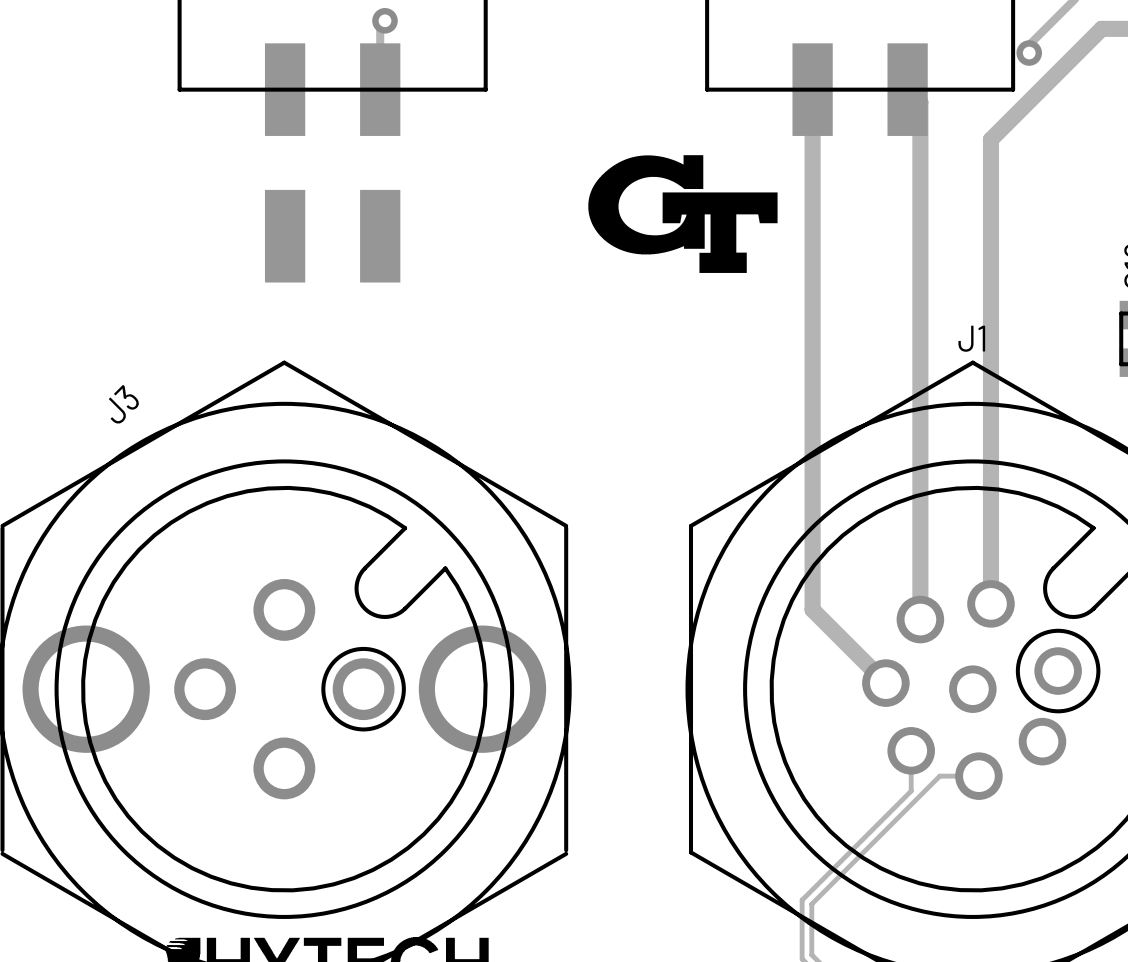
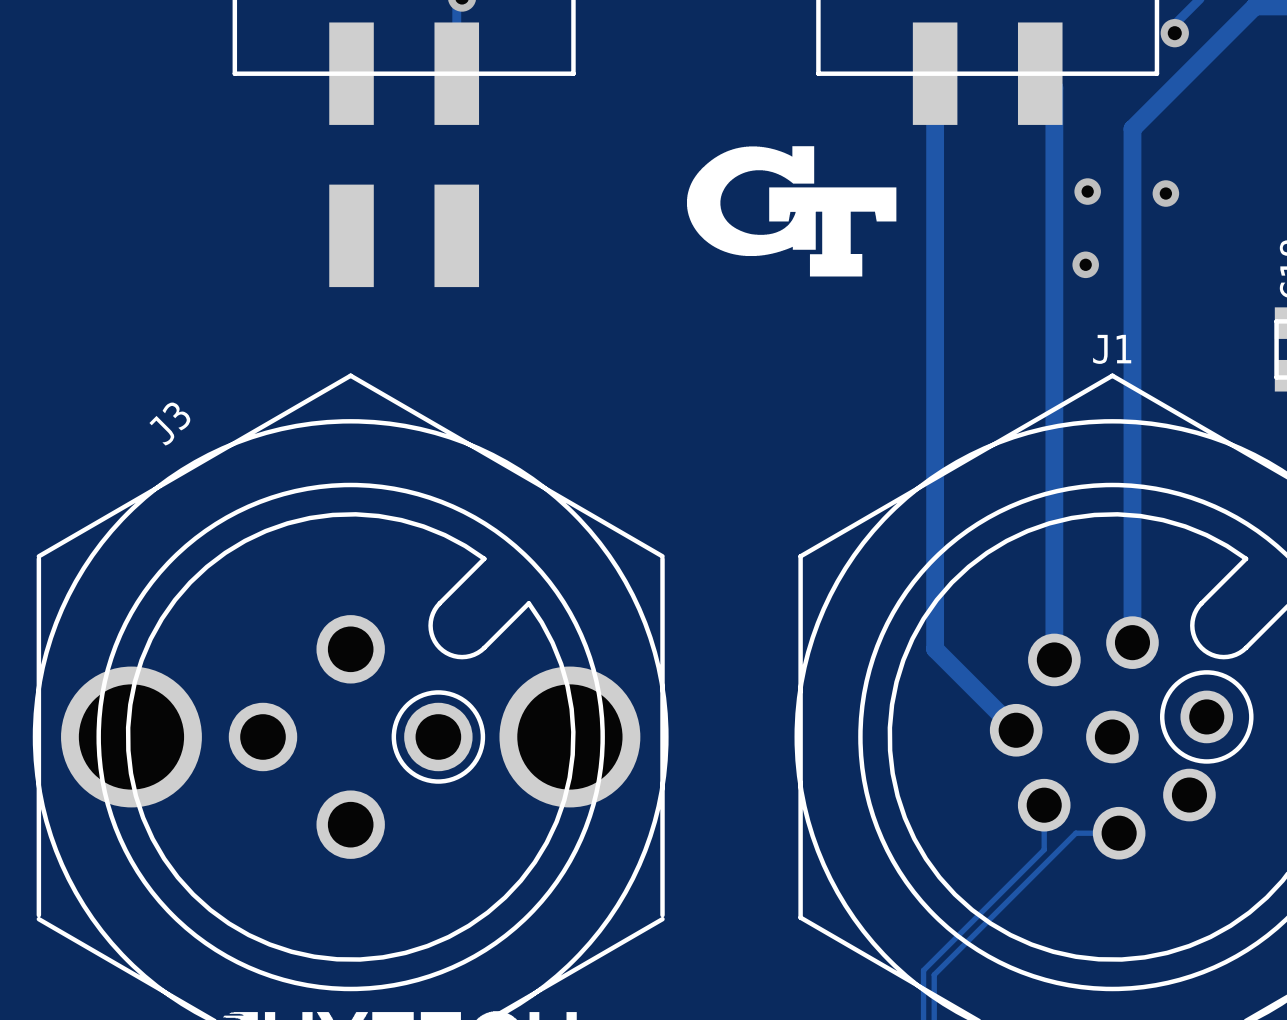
via: none -> (1087, 191)
via: none -> (1165, 193)
via: none -> (1085, 264)

